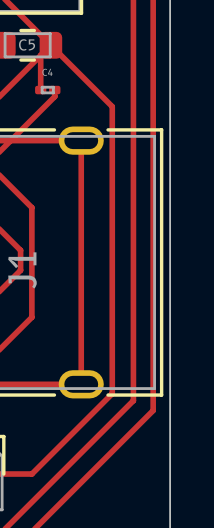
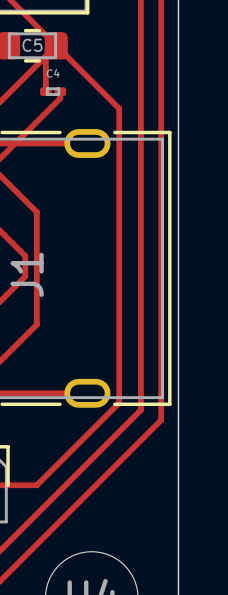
track: (81, 140) (81, 384) -> none

